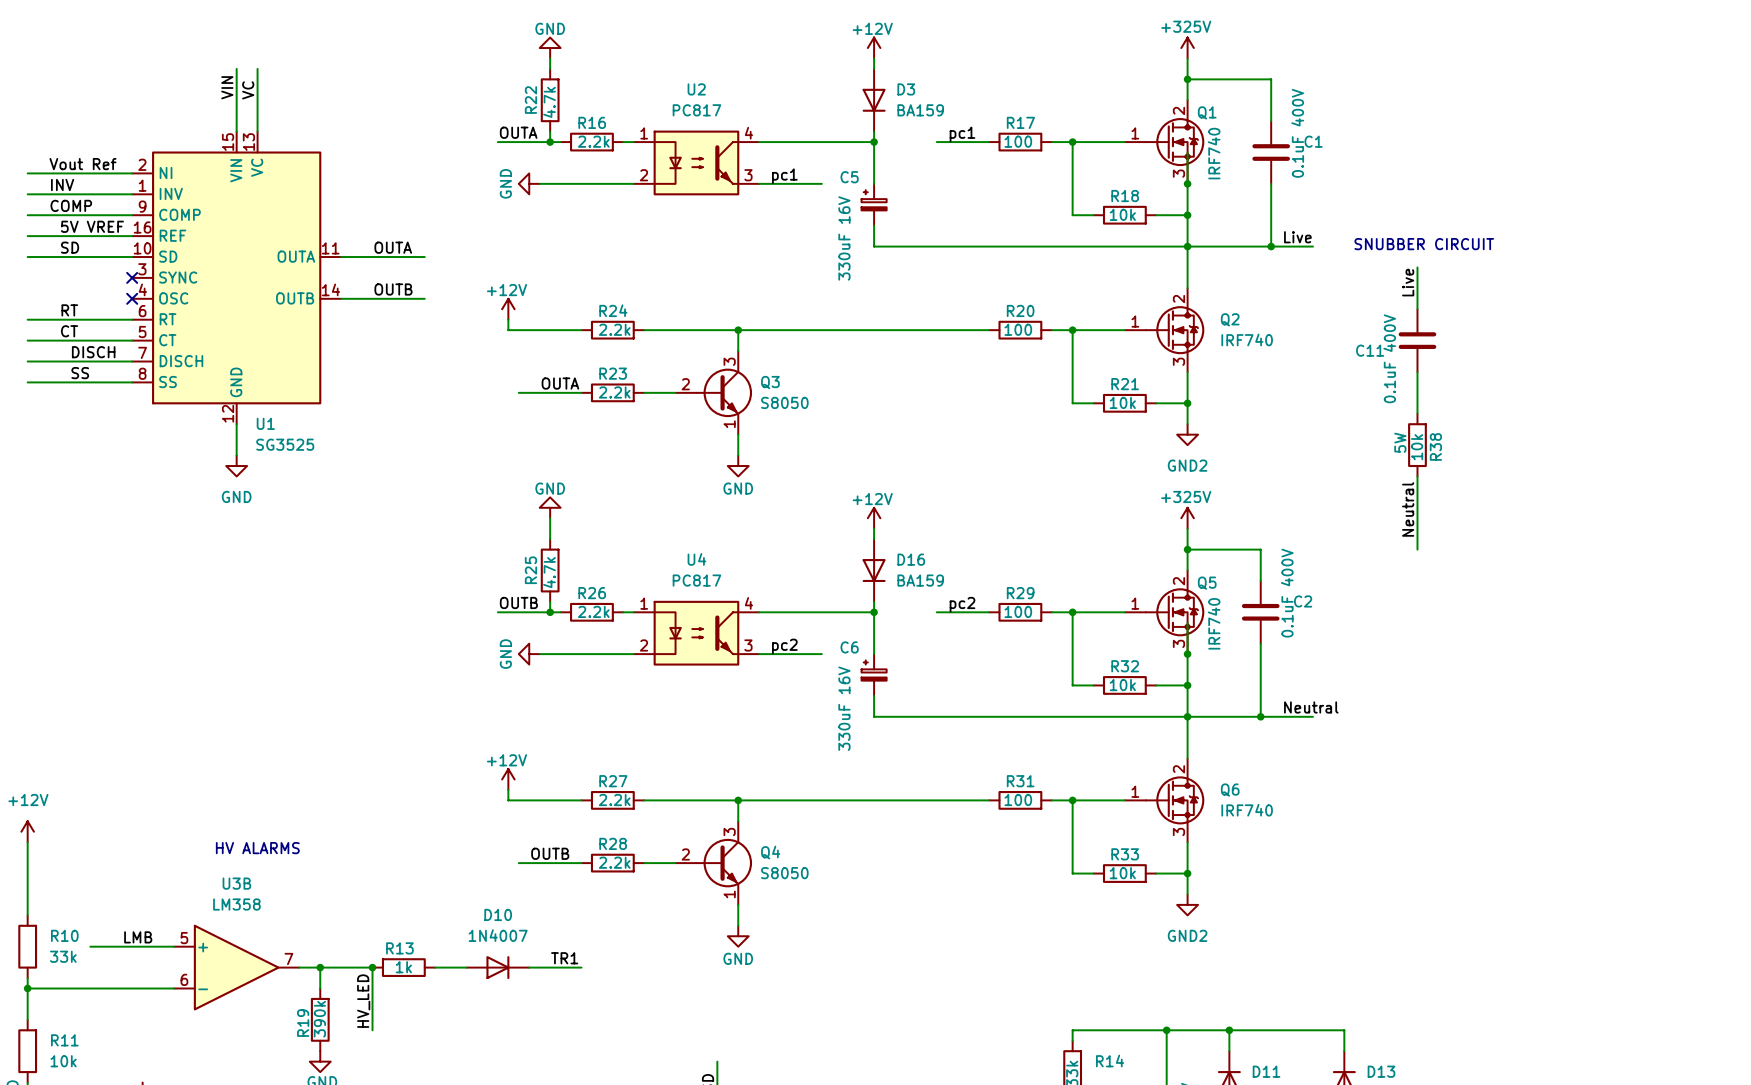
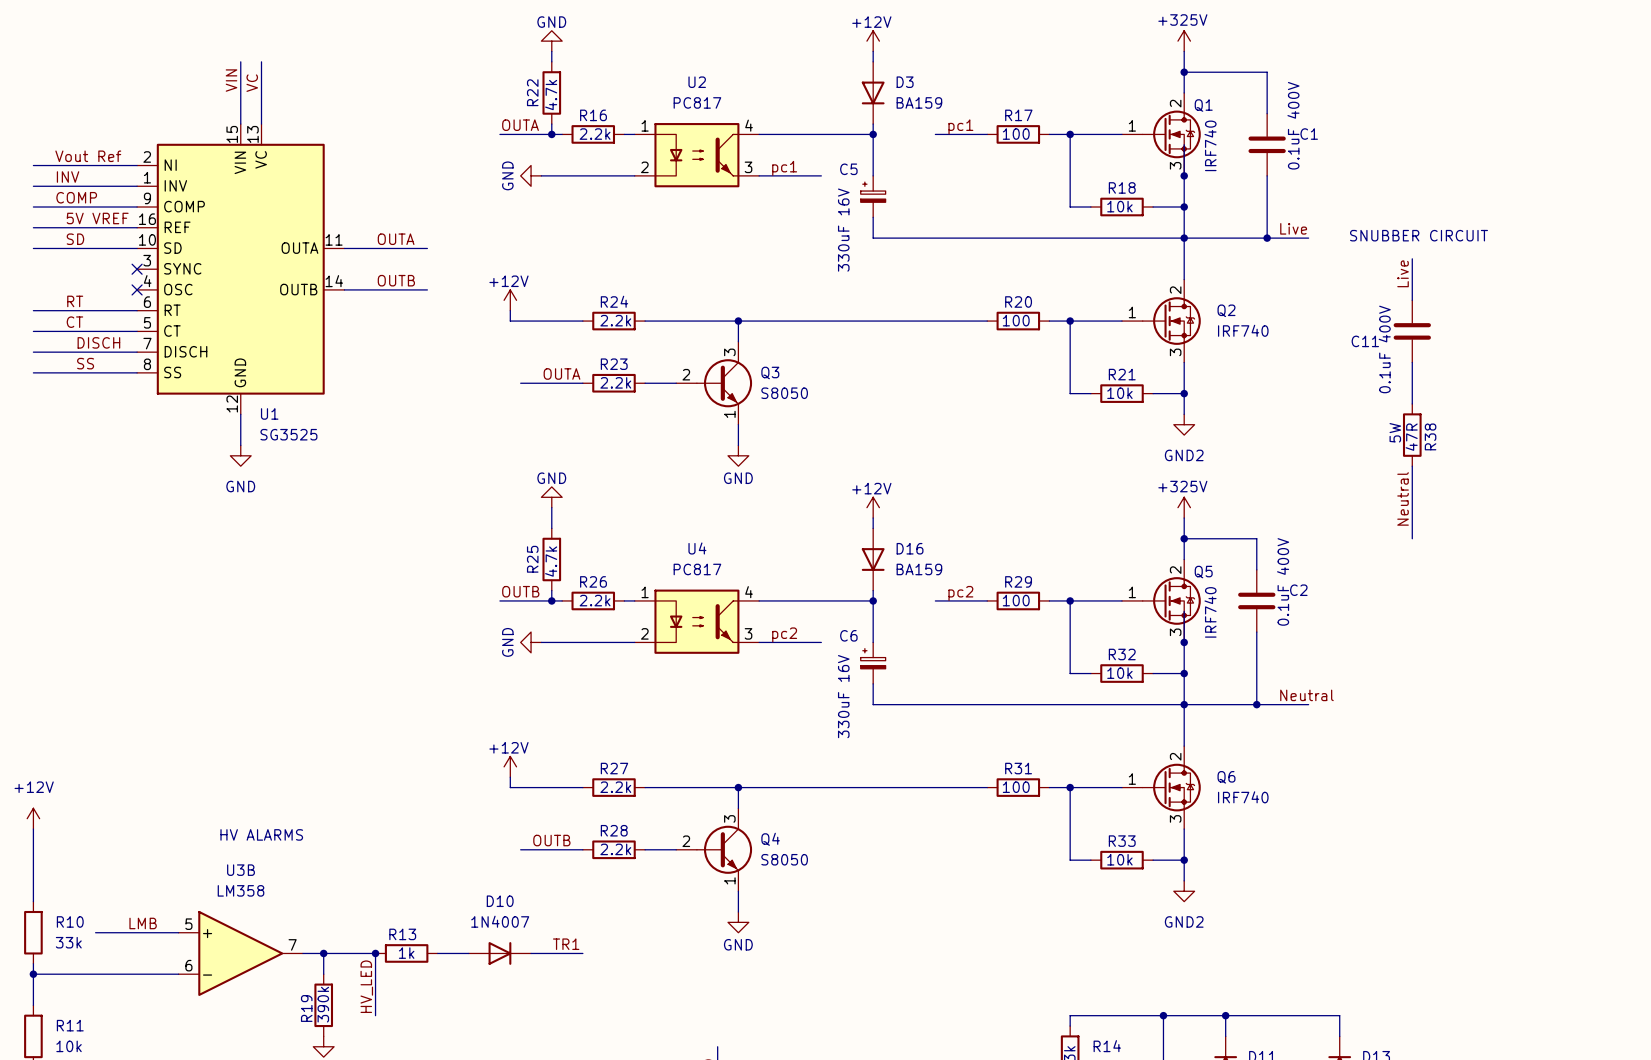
R38 value: 10k (1417, 447) -> 47R (1411, 437)

